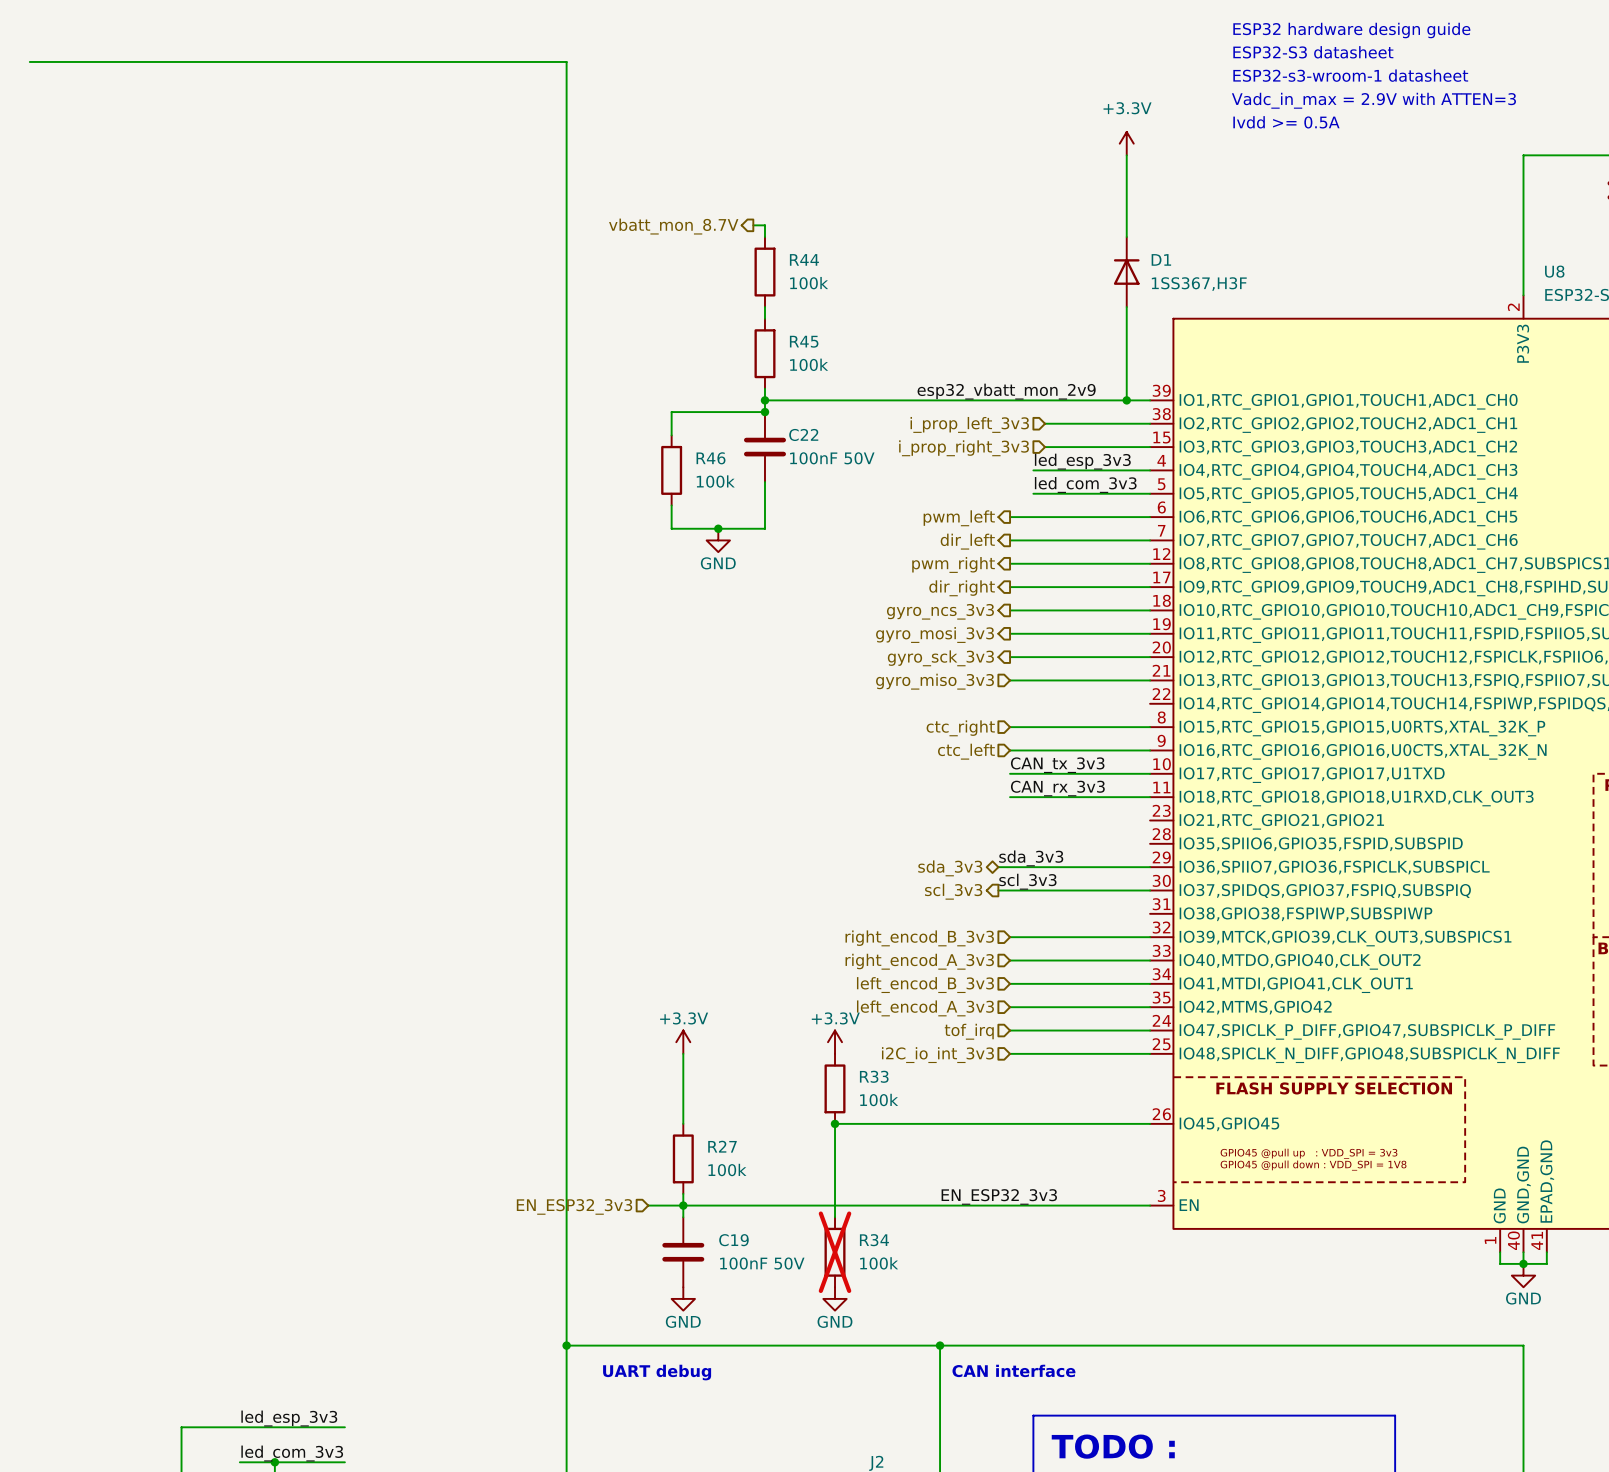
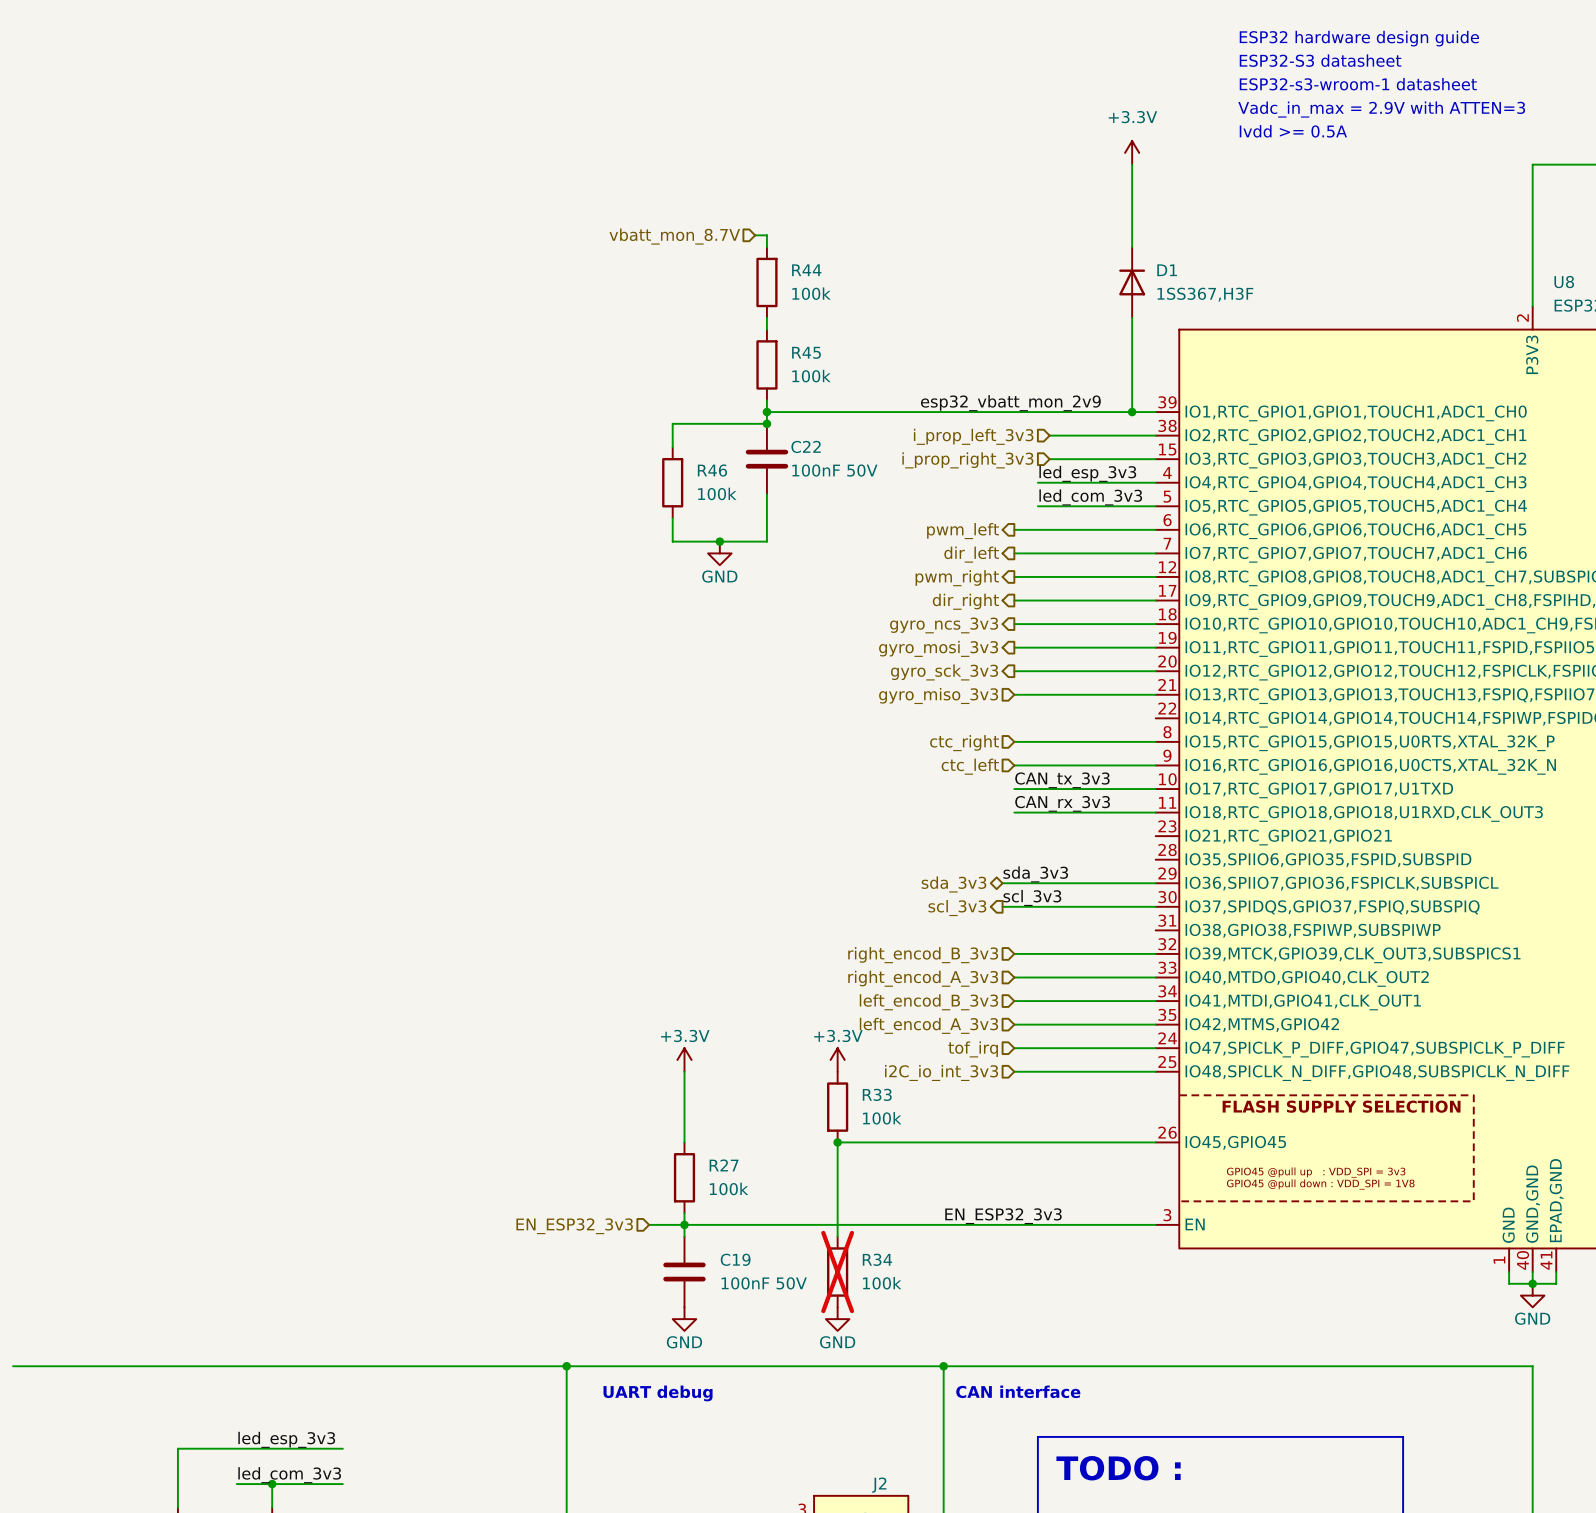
wire: (29, 61) (566, 61) (566, 1345) -> (13, 1366) (566, 1366)
hierarchical label shape: output (673, 226) -> input (674, 236)

